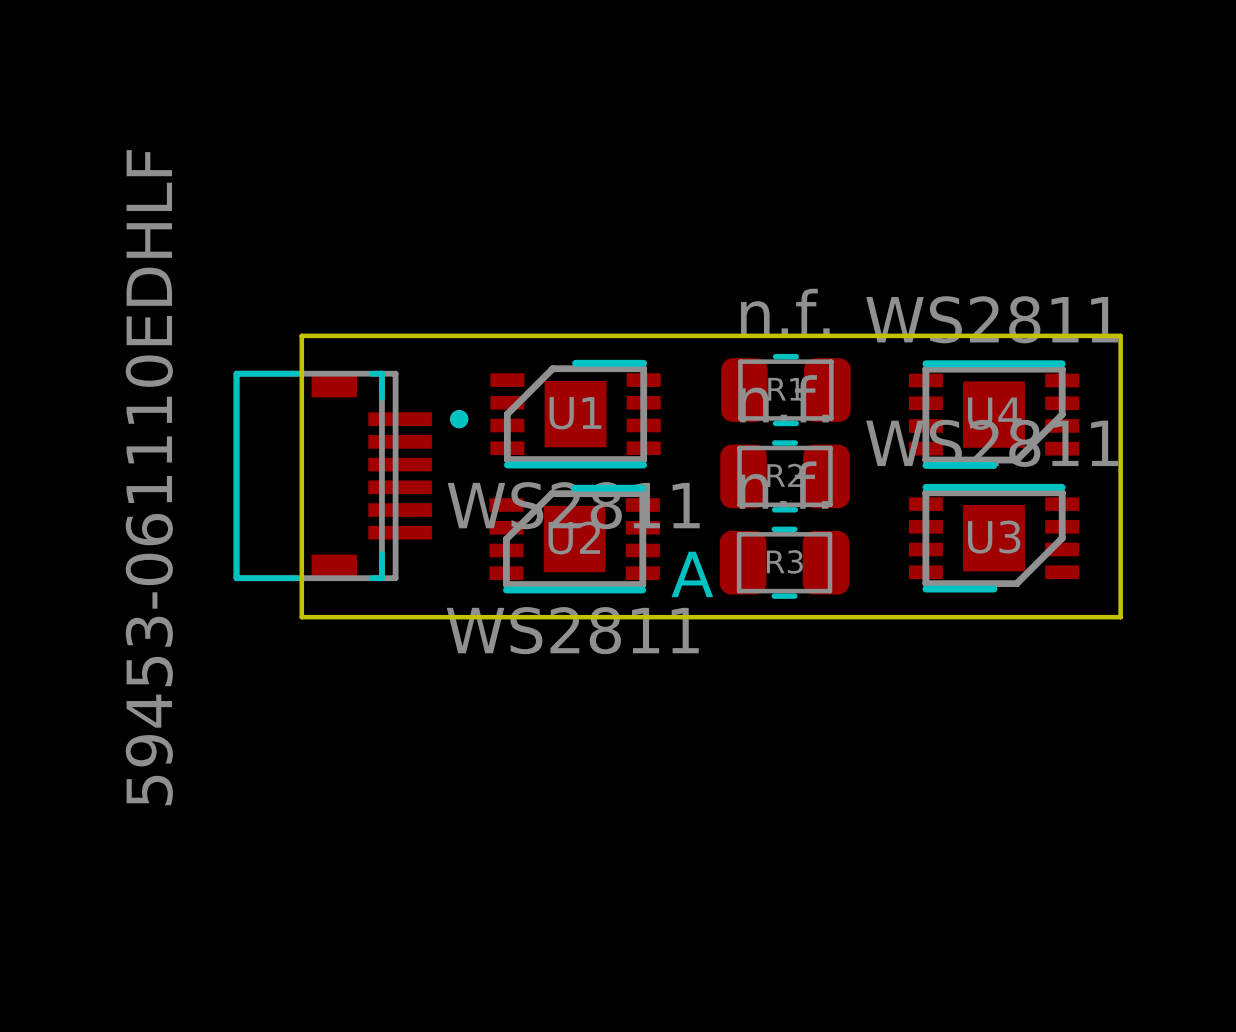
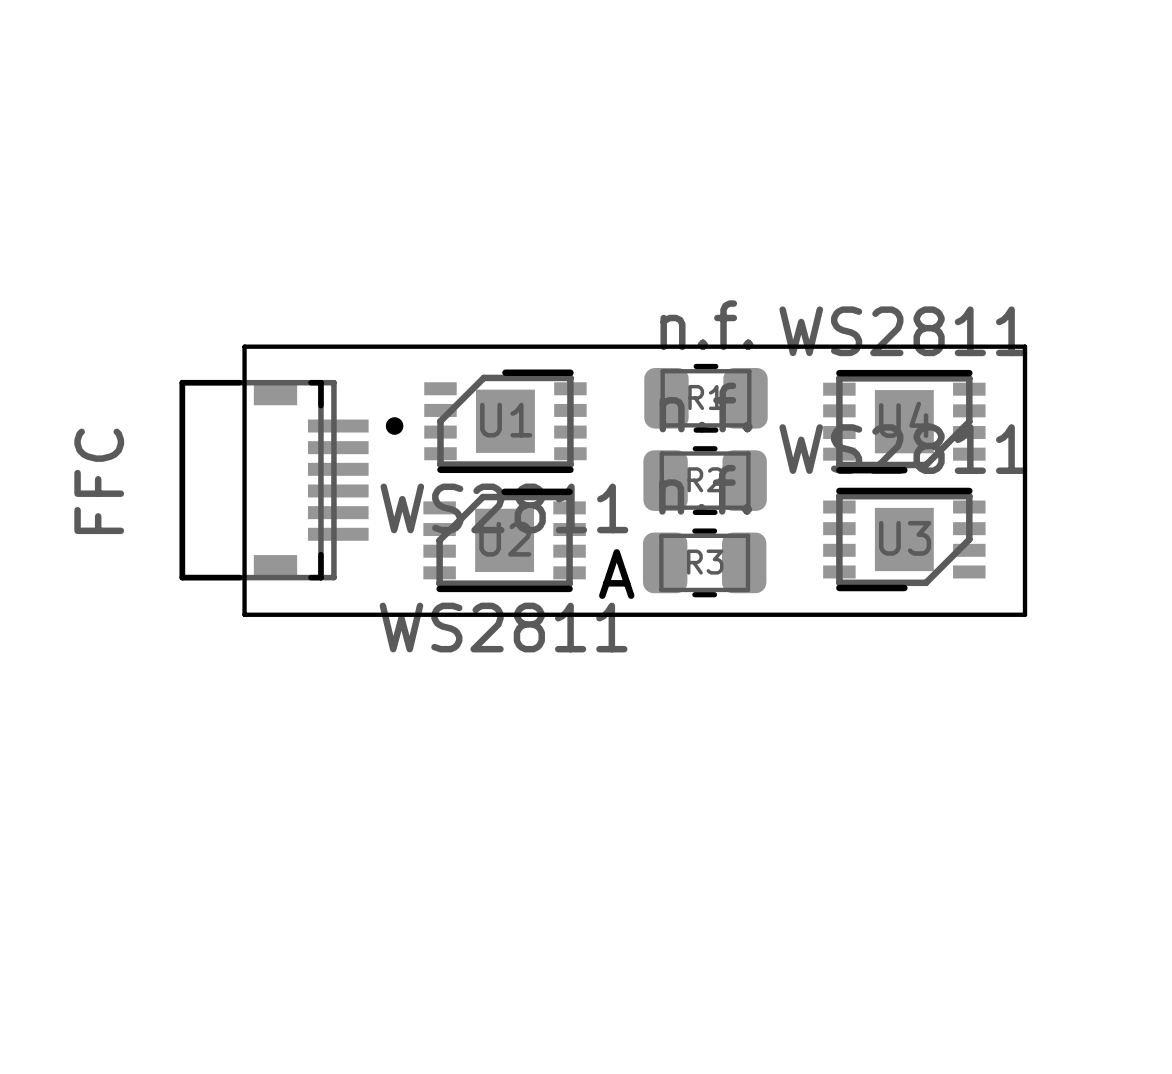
part value: 59453-061110EDHLF (149, 477) -> FFC (99, 481)

